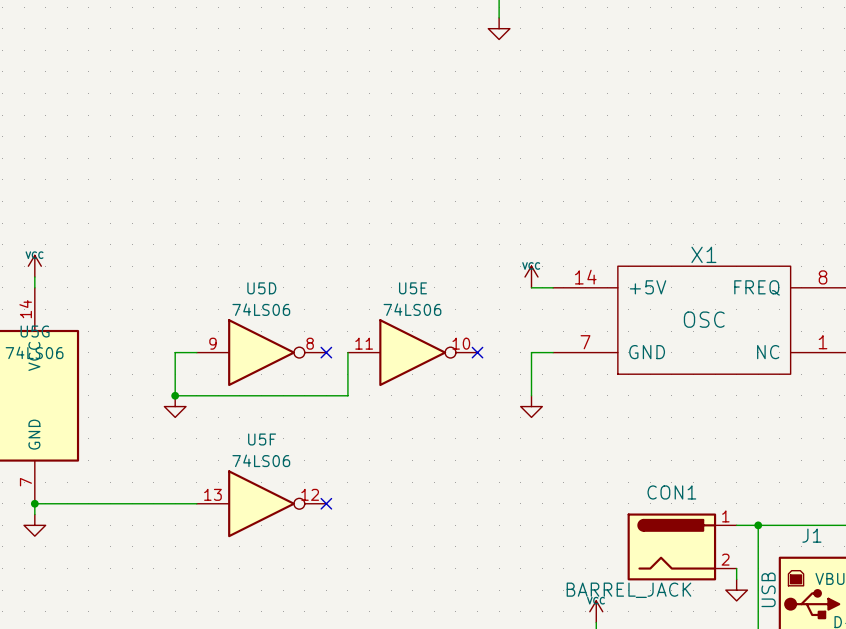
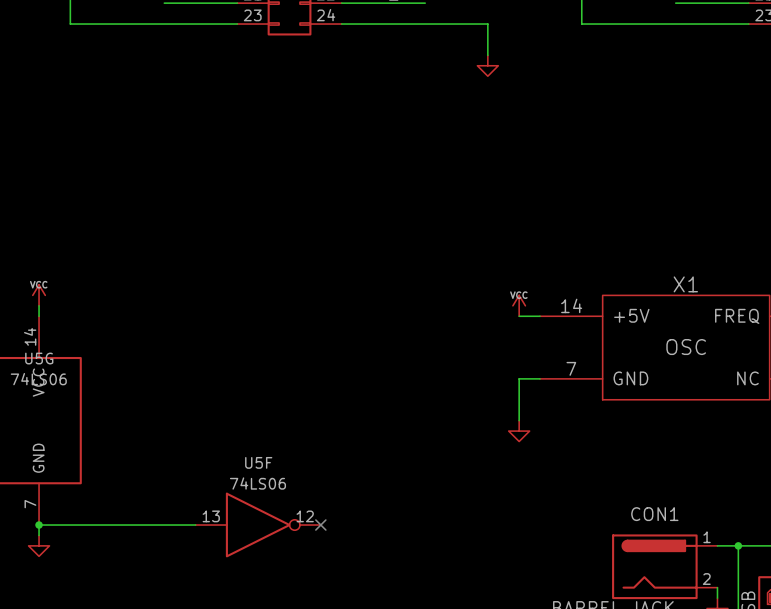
wire: (196, 352) (175, 352) (175, 395) (347, 395) (347, 352) -> none
U5D: 74LS06 (261, 352) -> none
no-connect mark: (326, 352) -> none
U5E: 74LS06 (412, 352) -> none
no-connect mark: (477, 352) -> none
junction: (175, 395) -> none
power symbol: (175, 406) -> none

